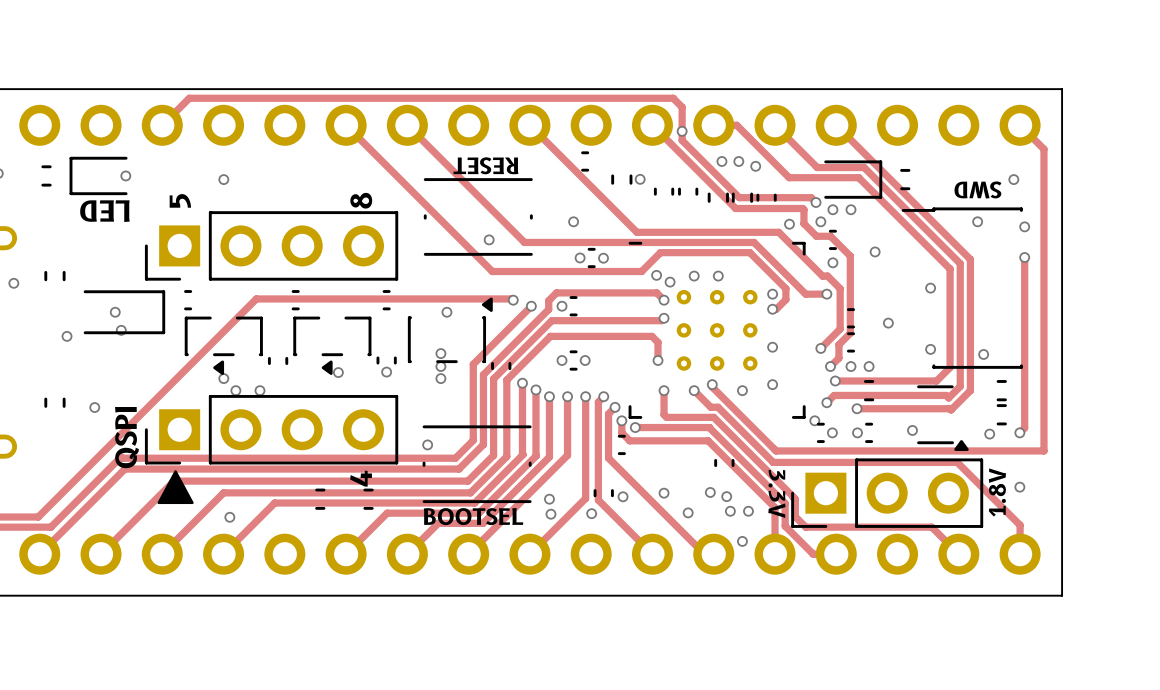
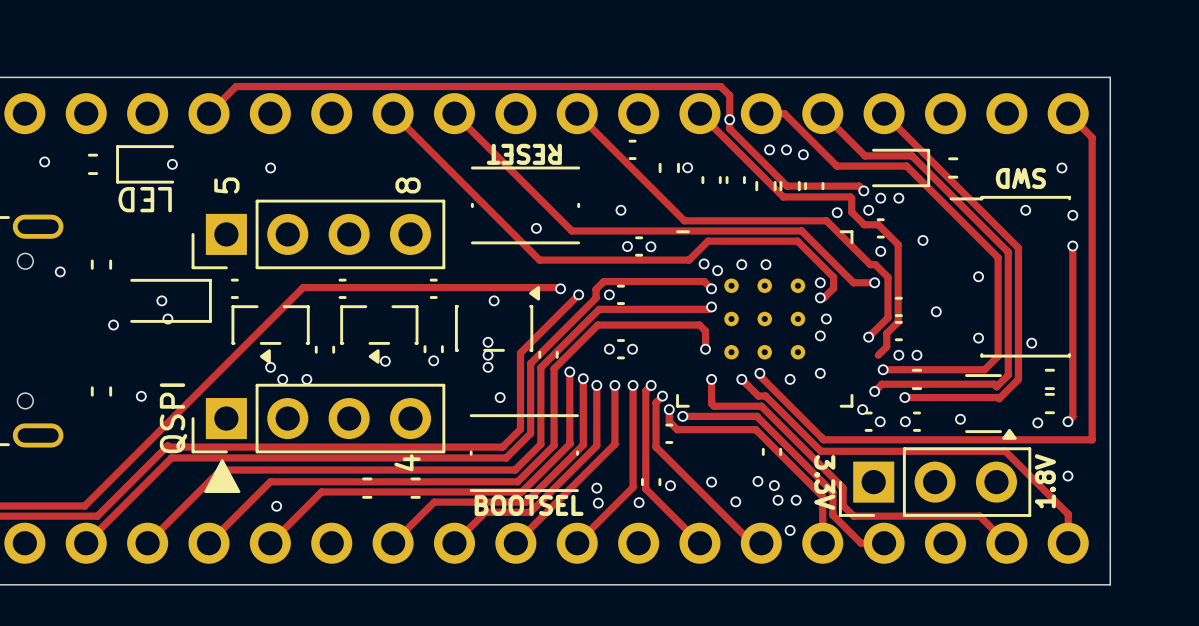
via position: (830, 366) -> (826, 319)
via position: (427, 444) -> (500, 397)

